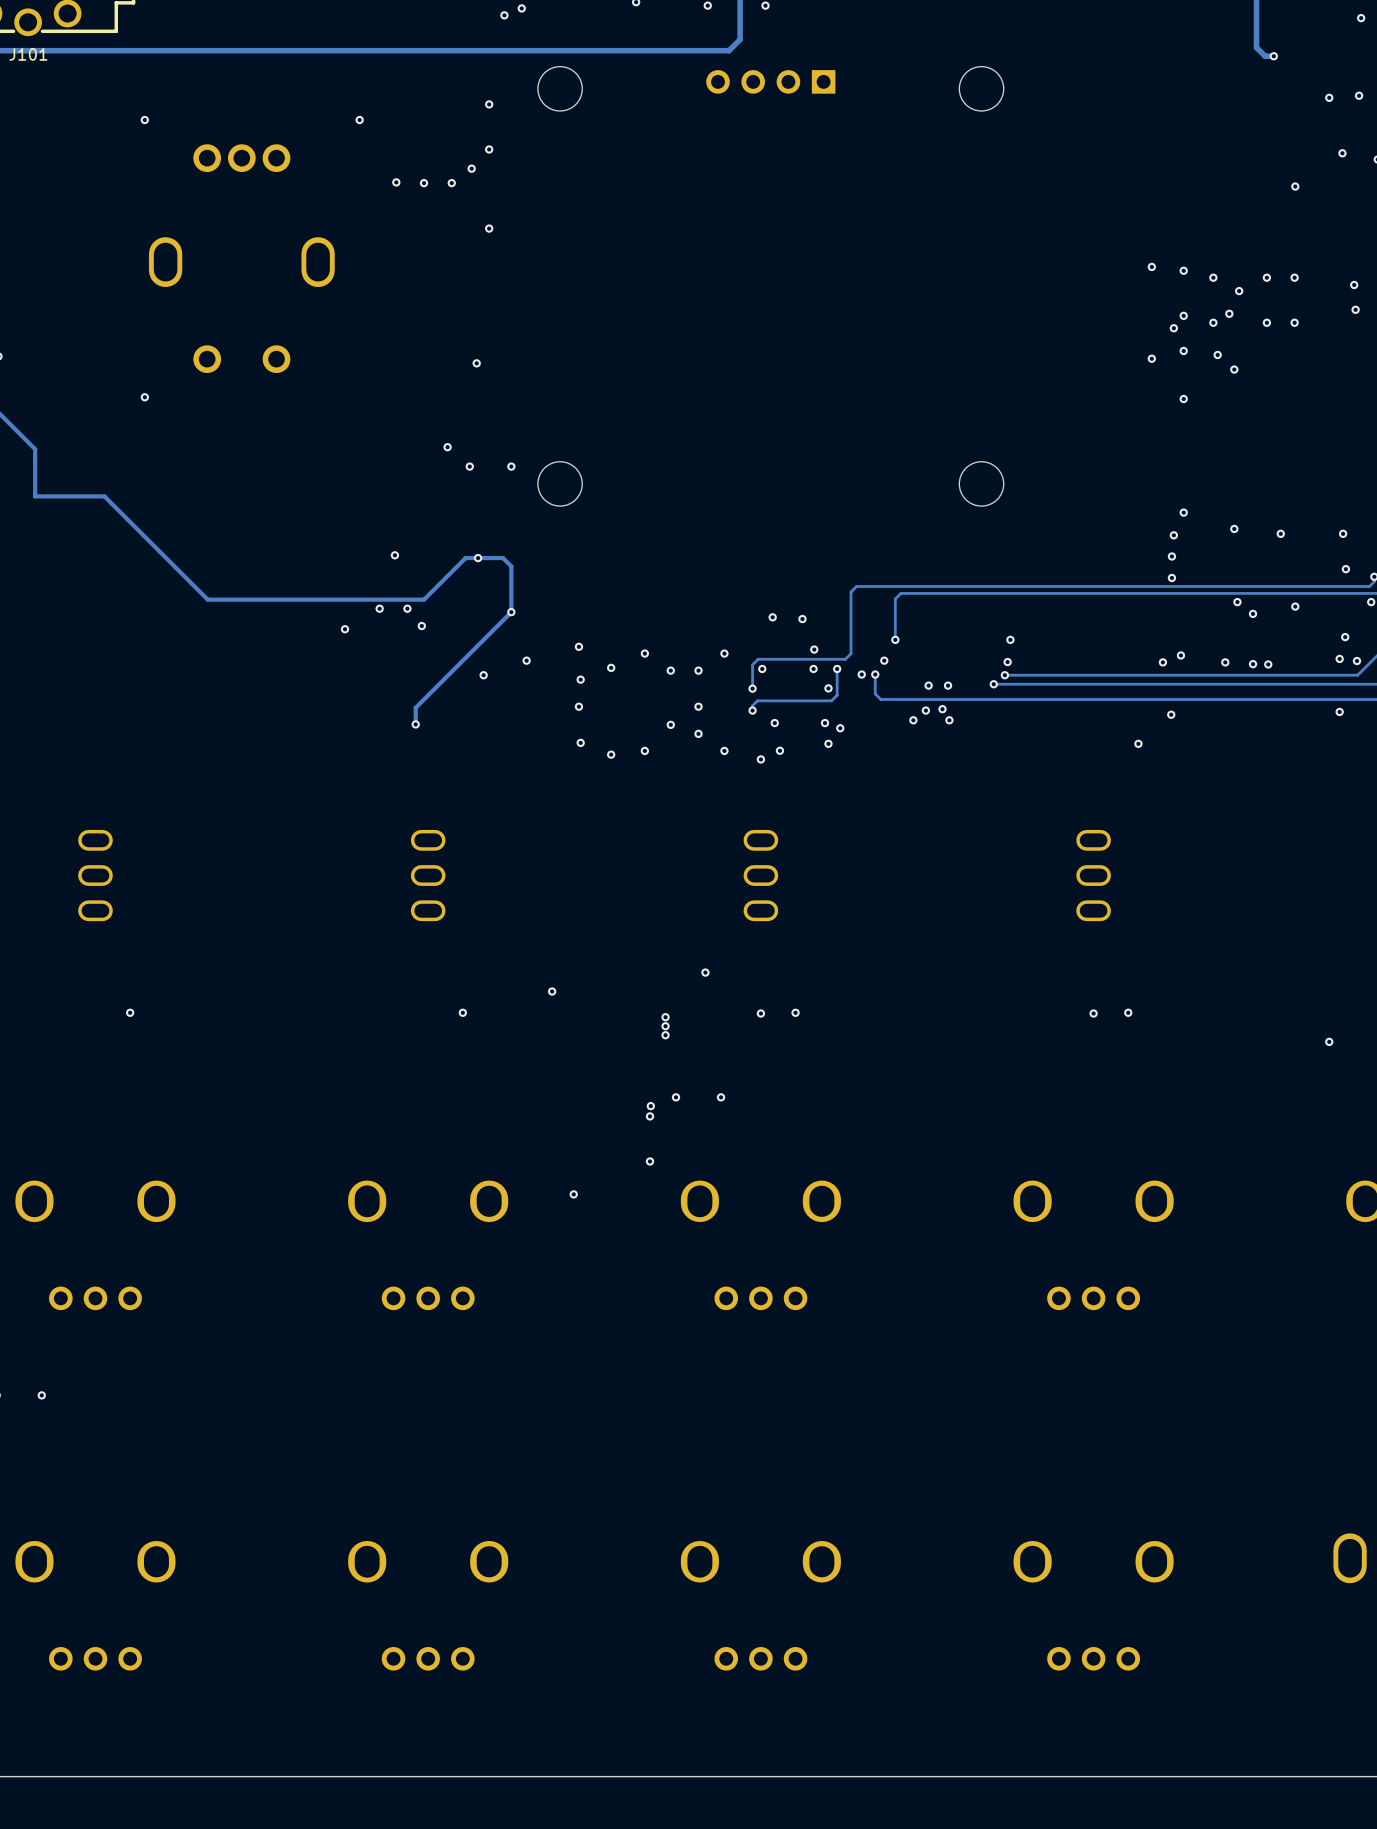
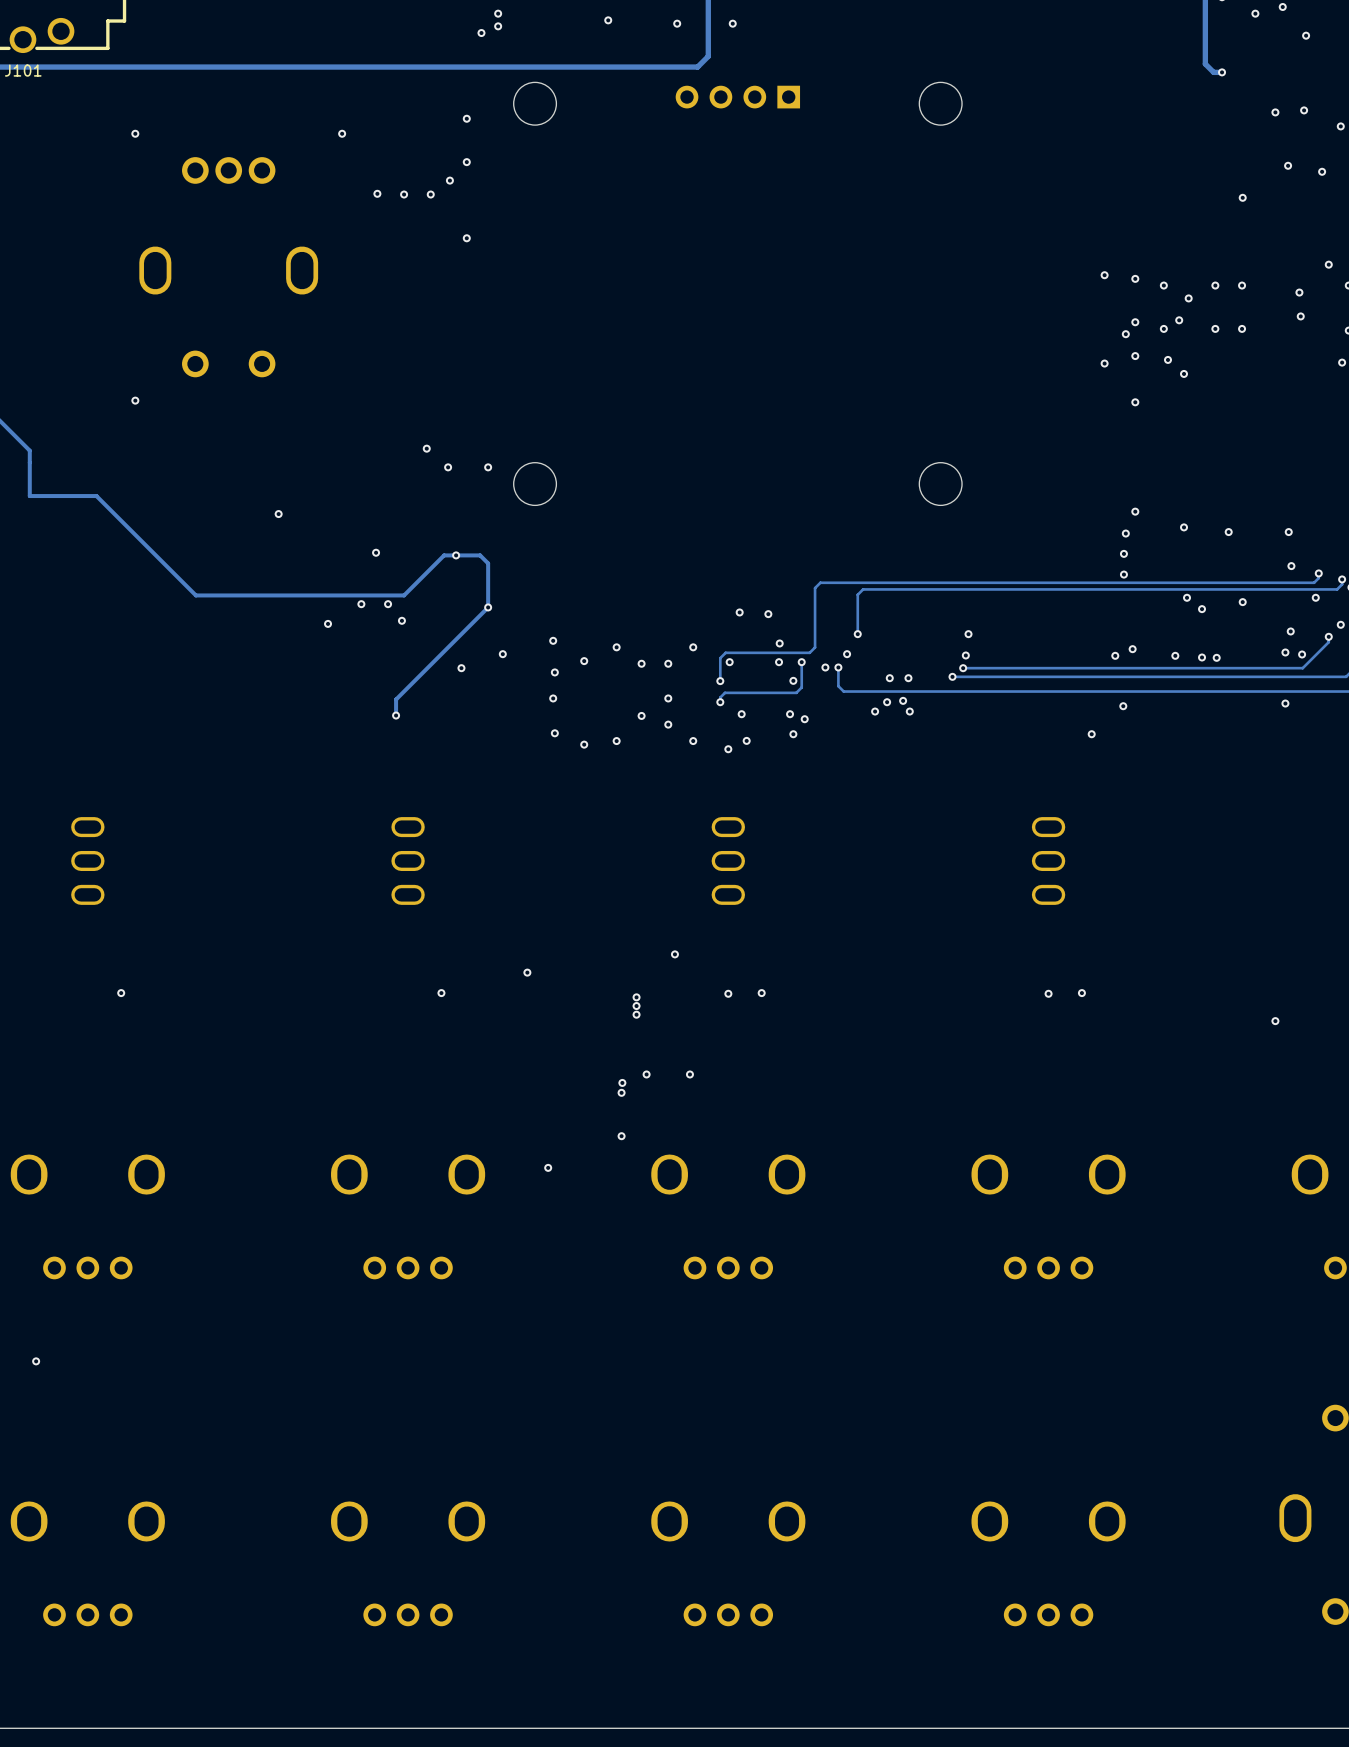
via: (476, 363) -> none
via: none -> (278, 514)

